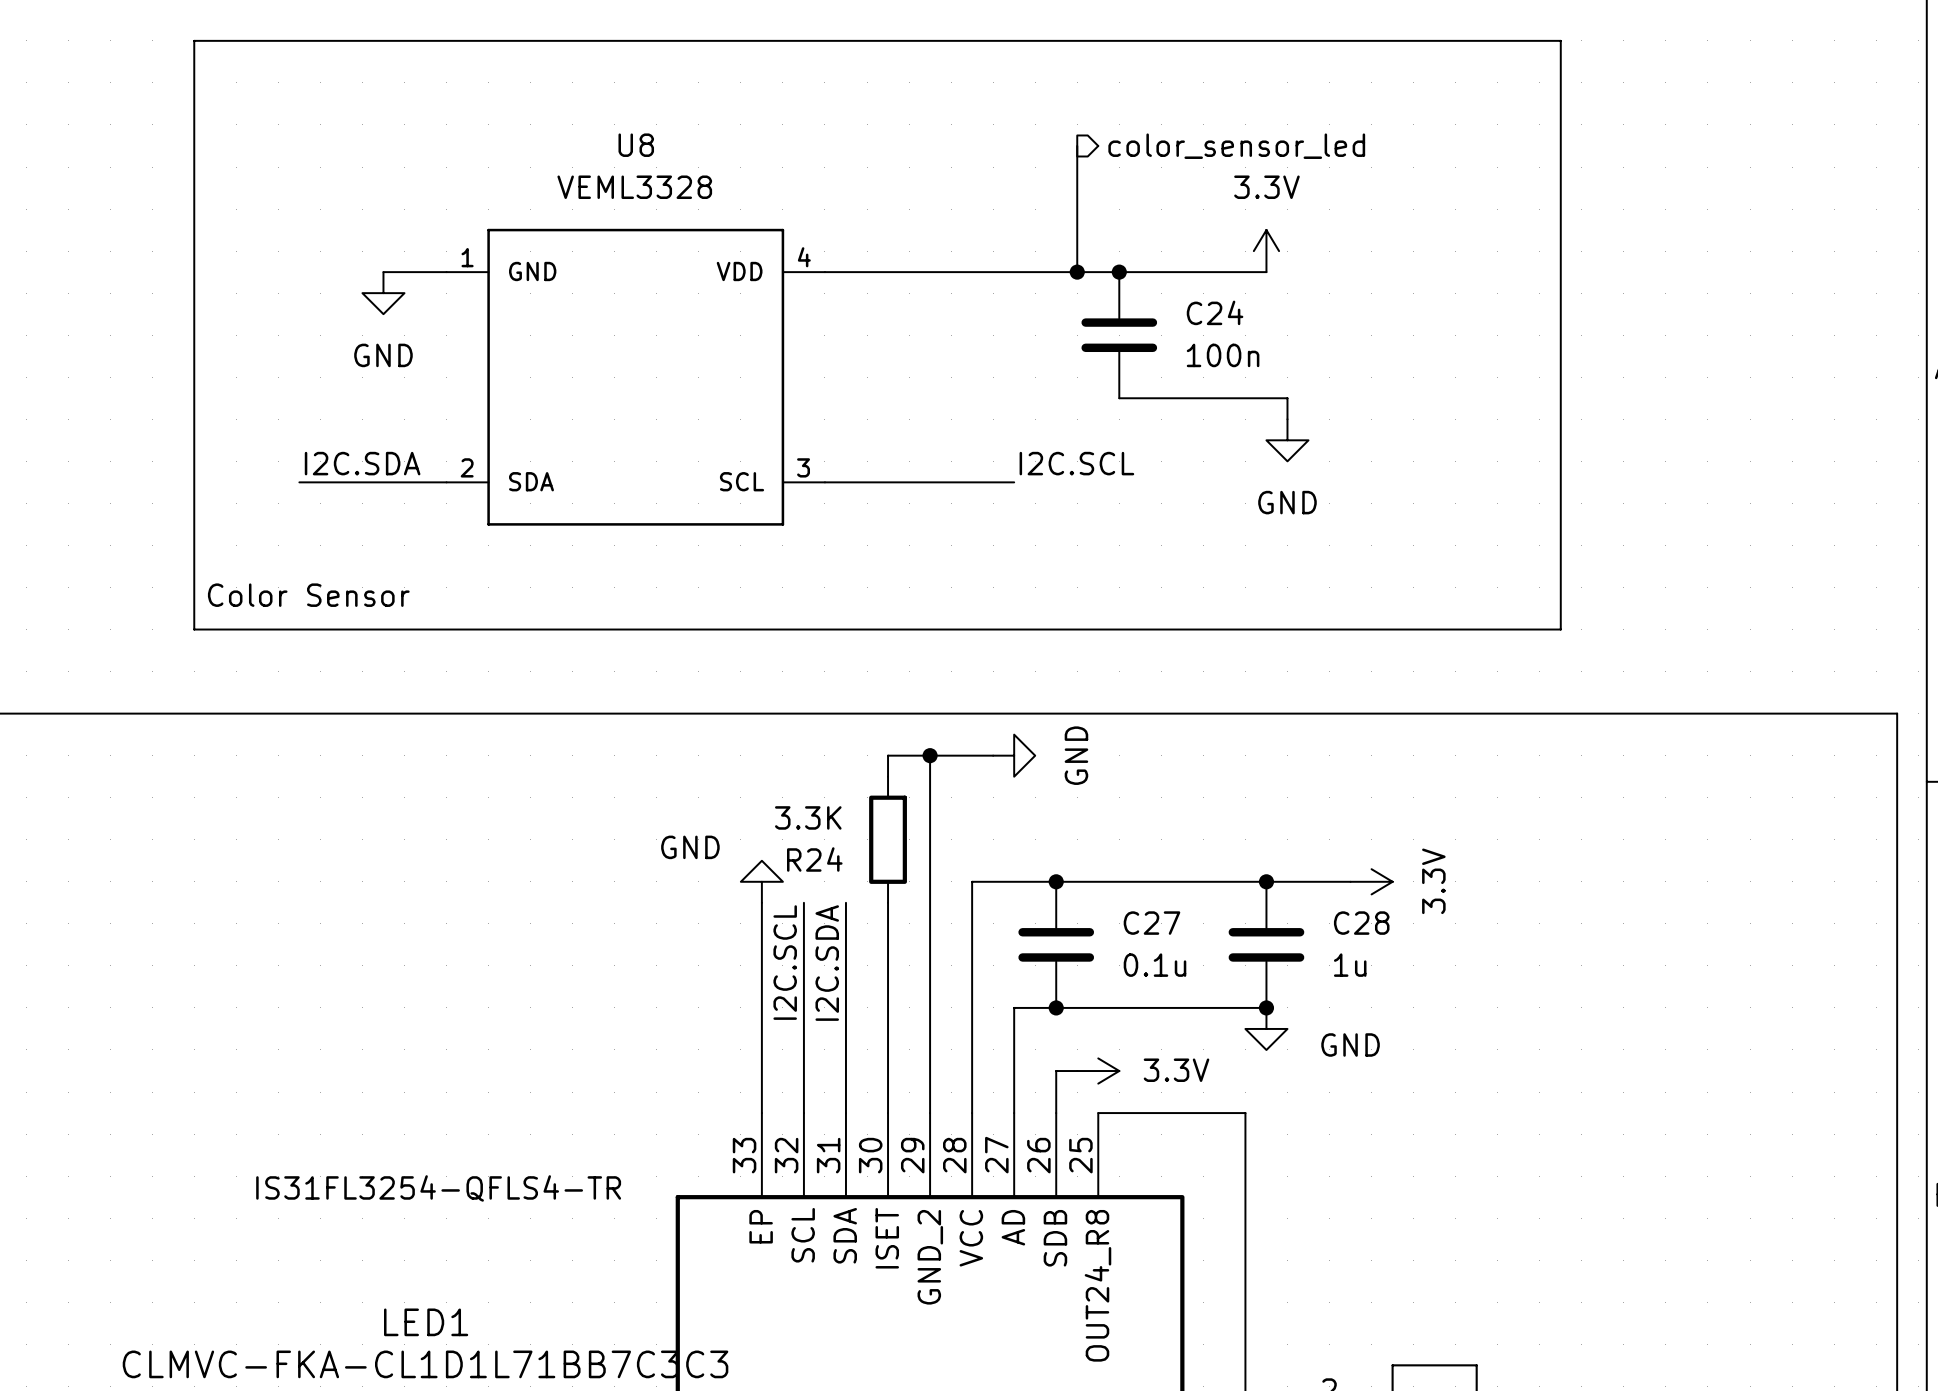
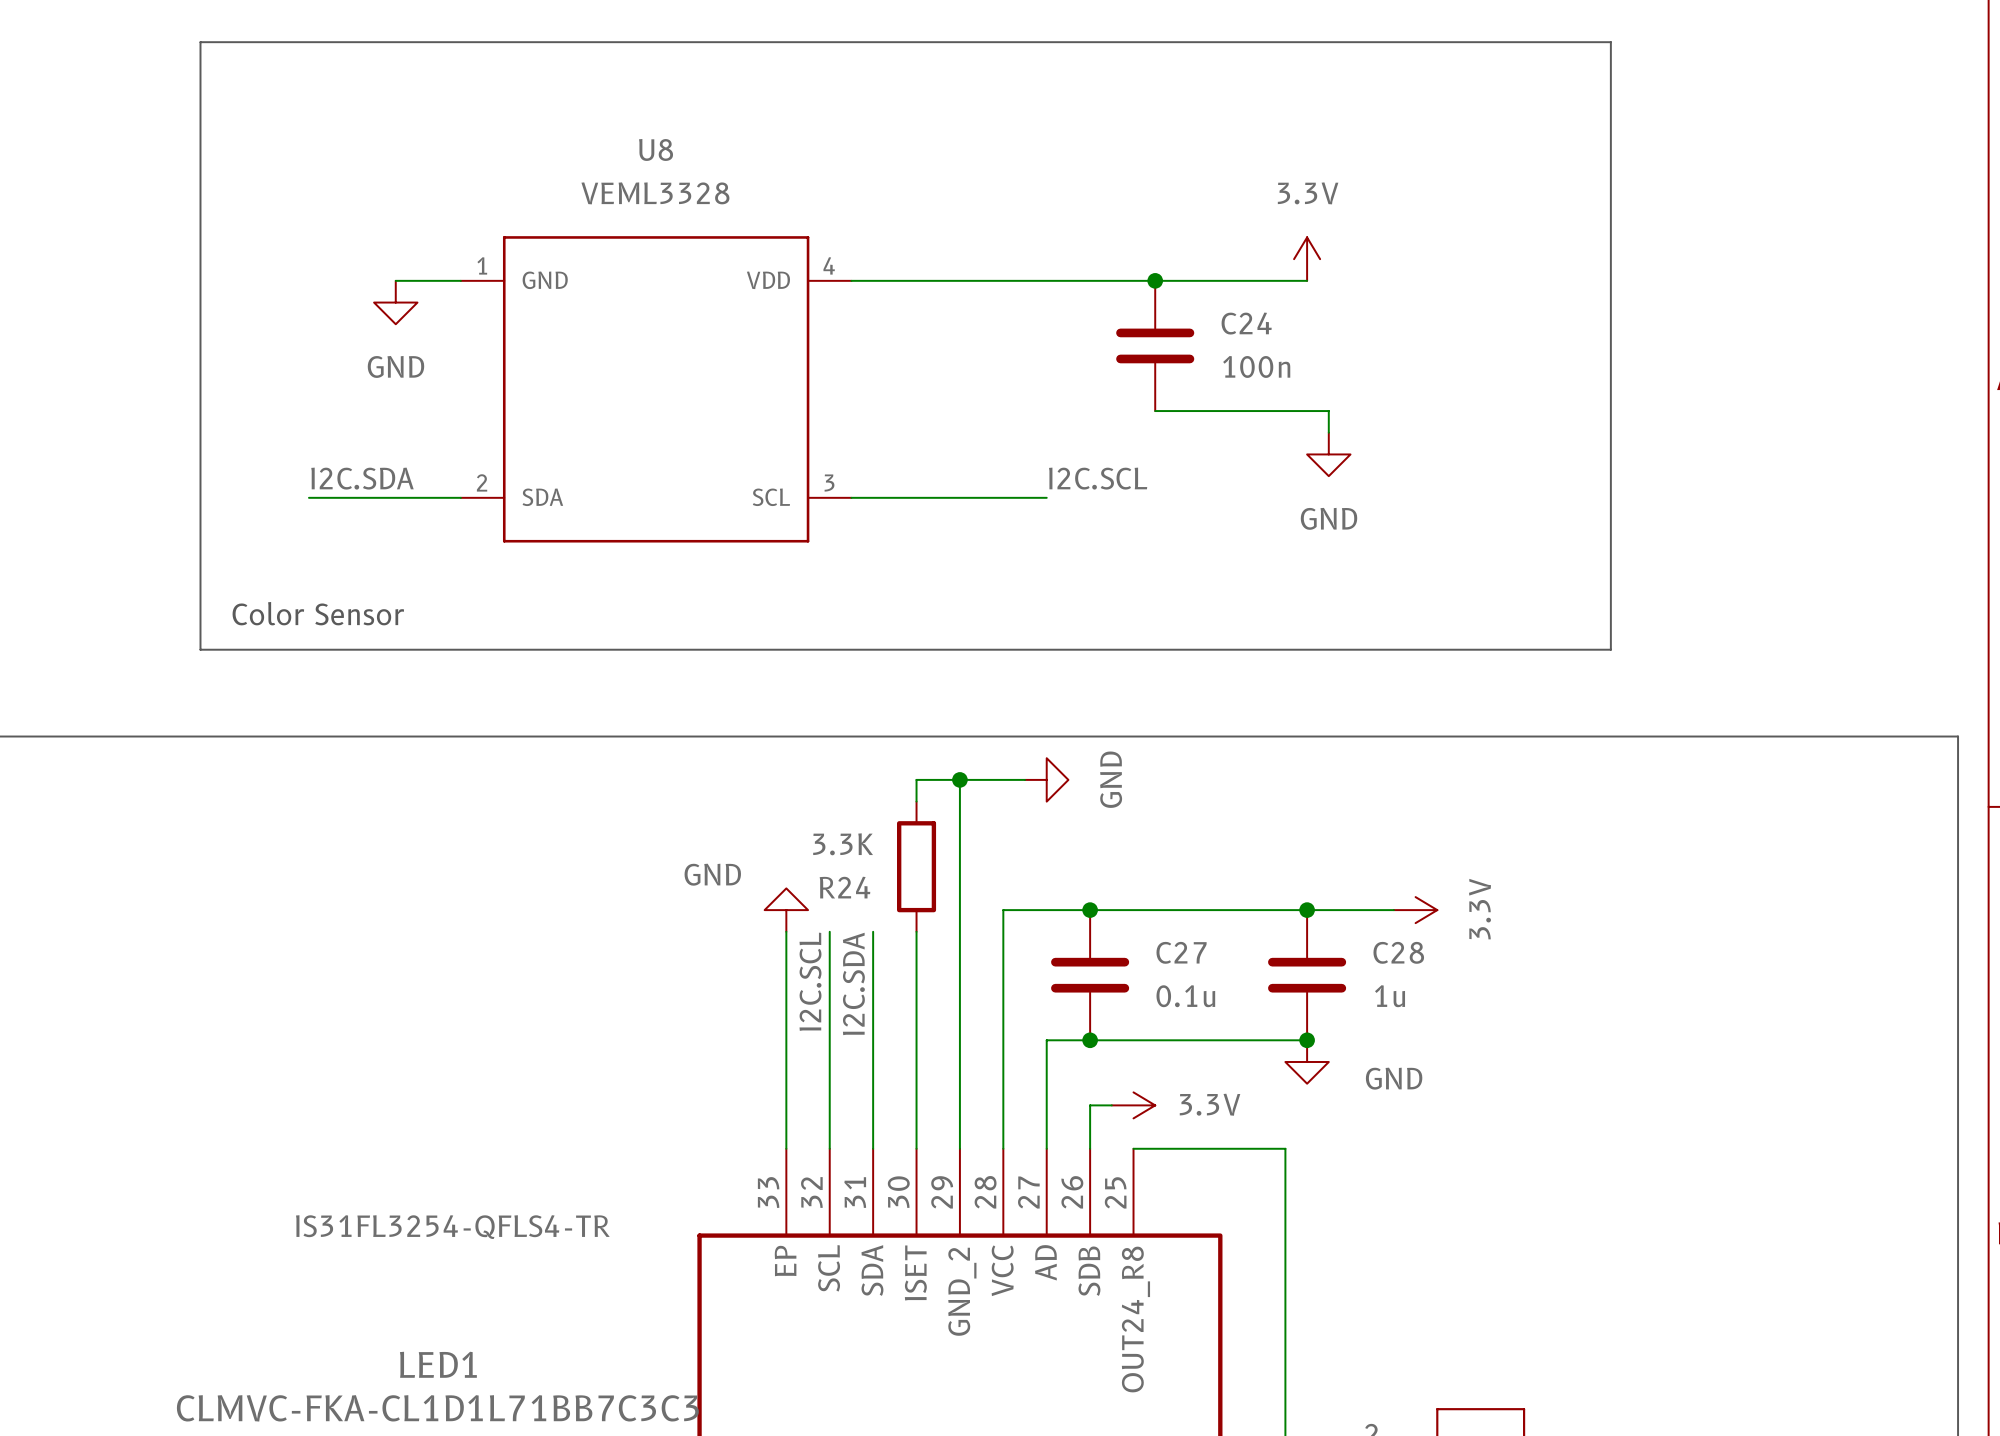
wire: (1077, 145) (1077, 272) -> none
hierarchical label: color_sensor_led (1236, 146) -> none
junction: (1077, 272) -> none

